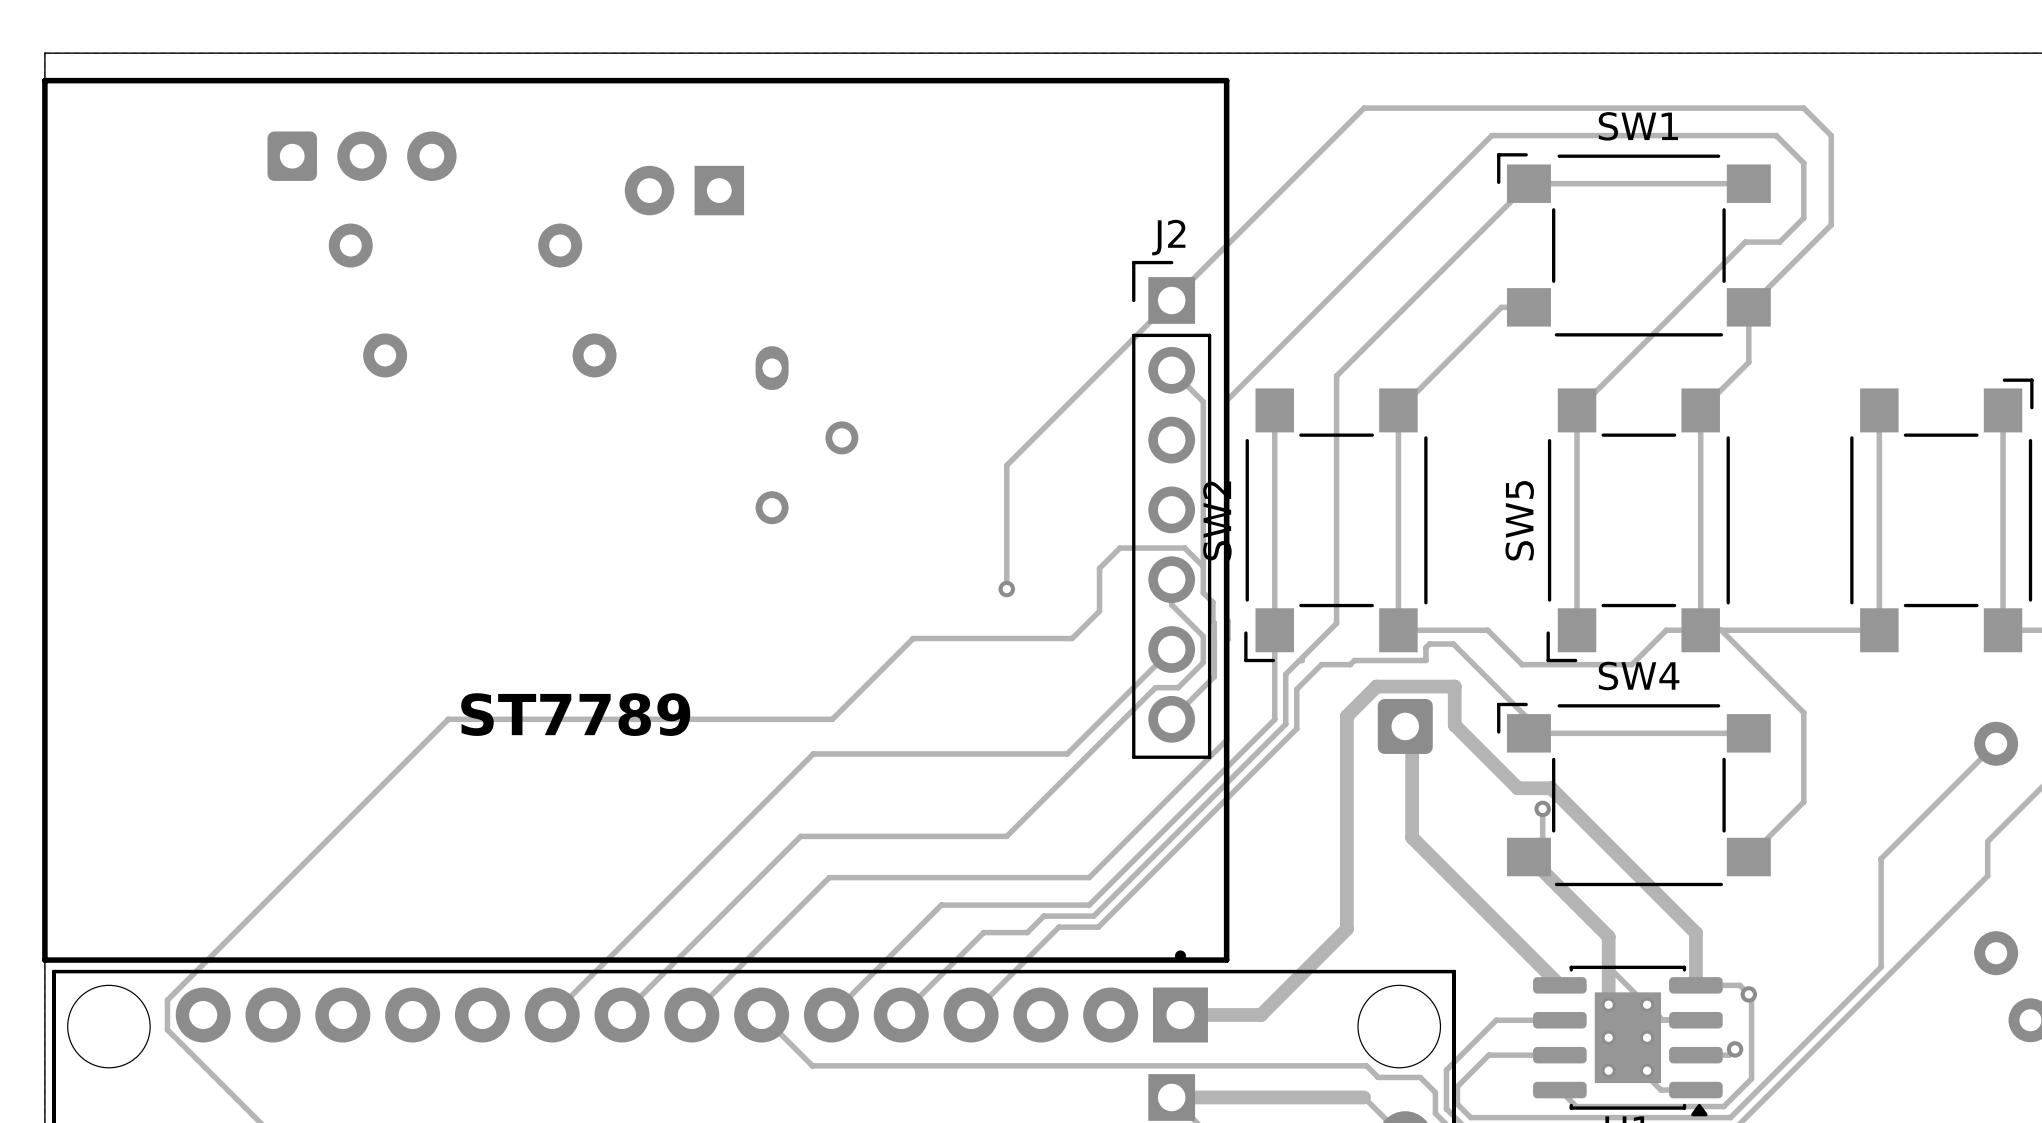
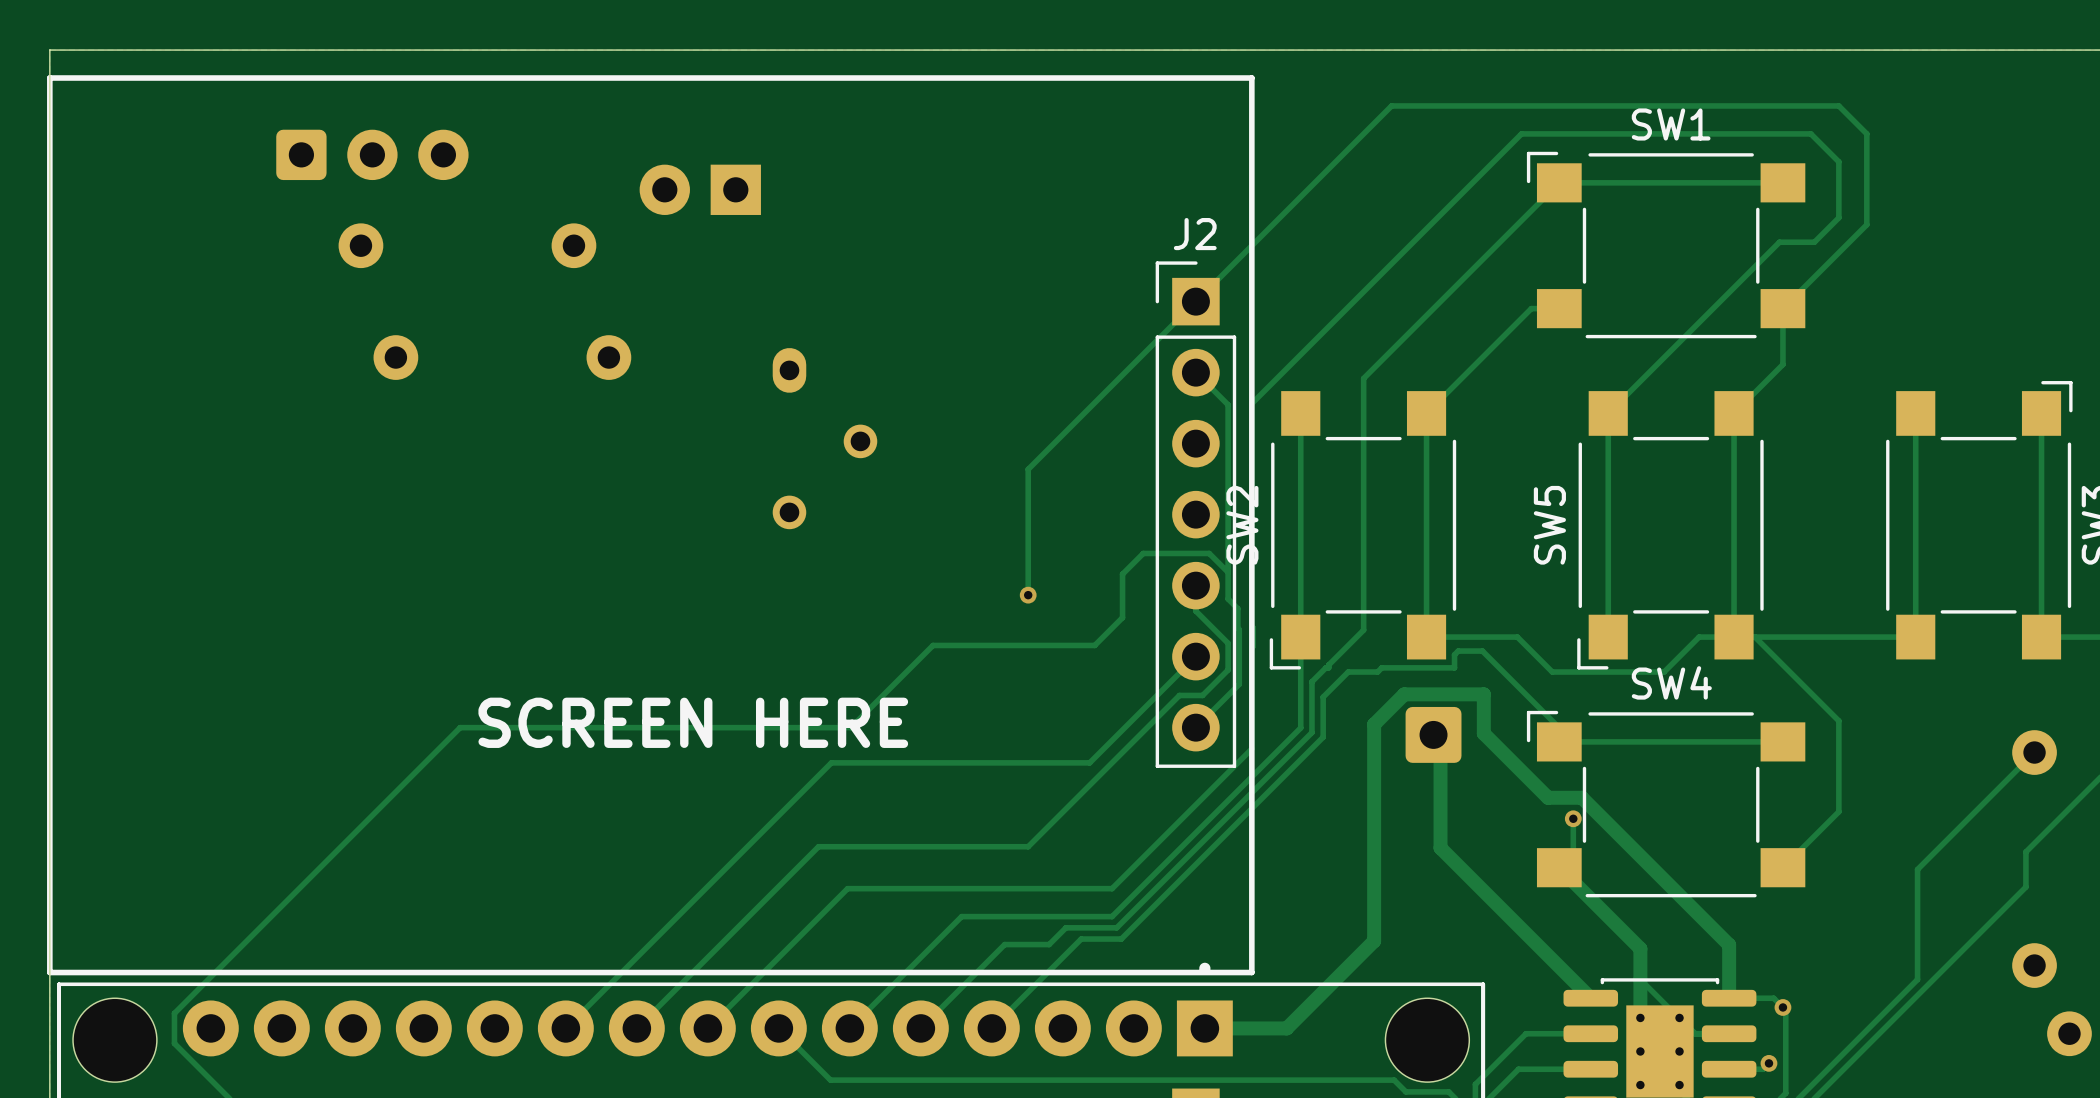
text: ST7789 (575, 714) -> SCREEN HERE (693, 722)

